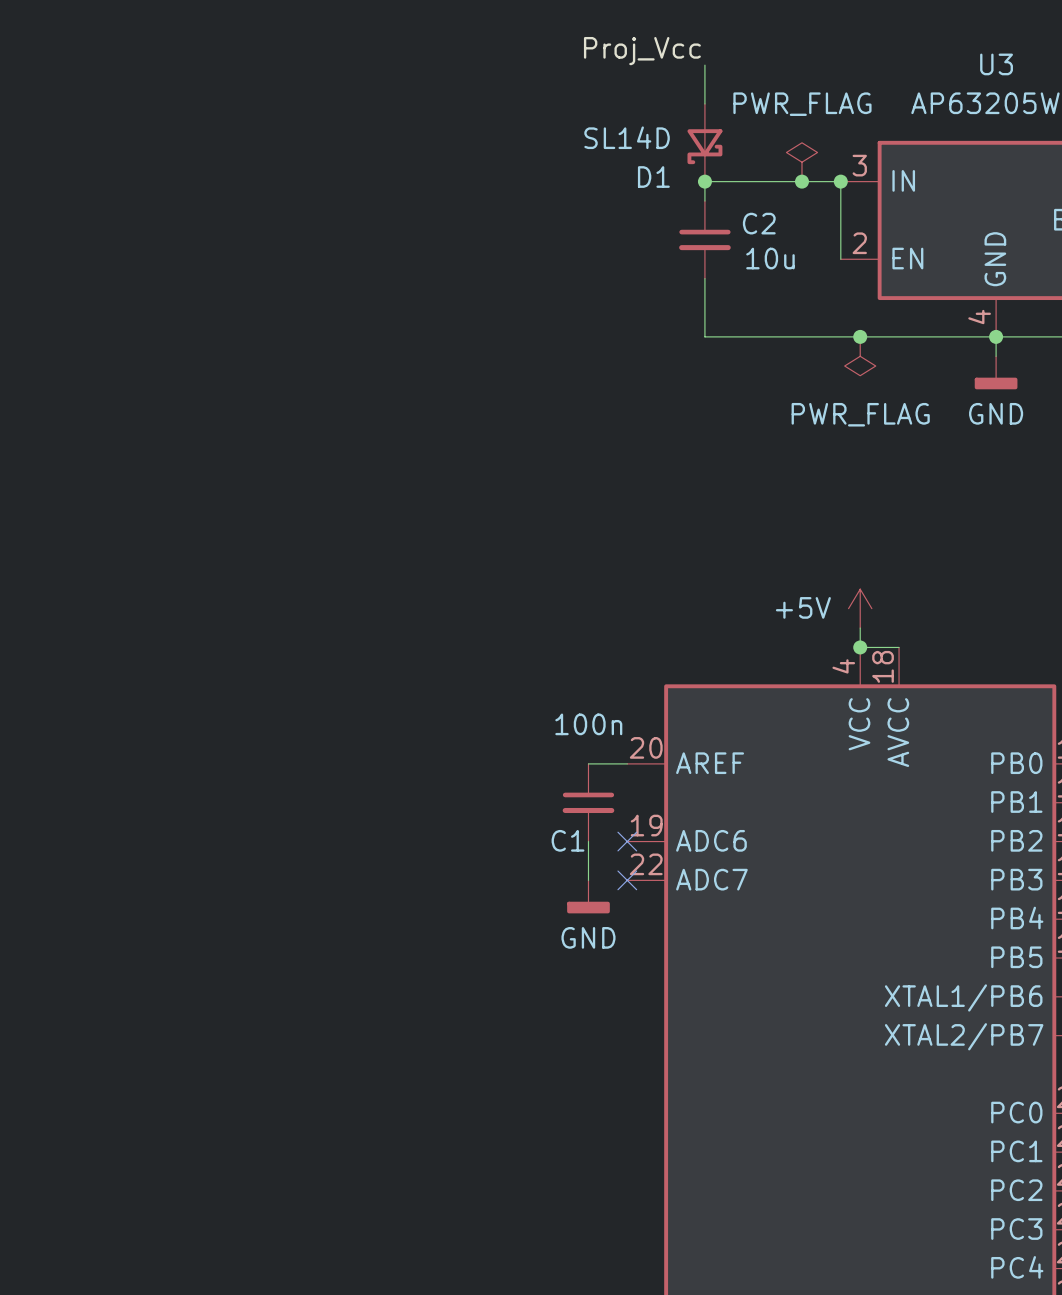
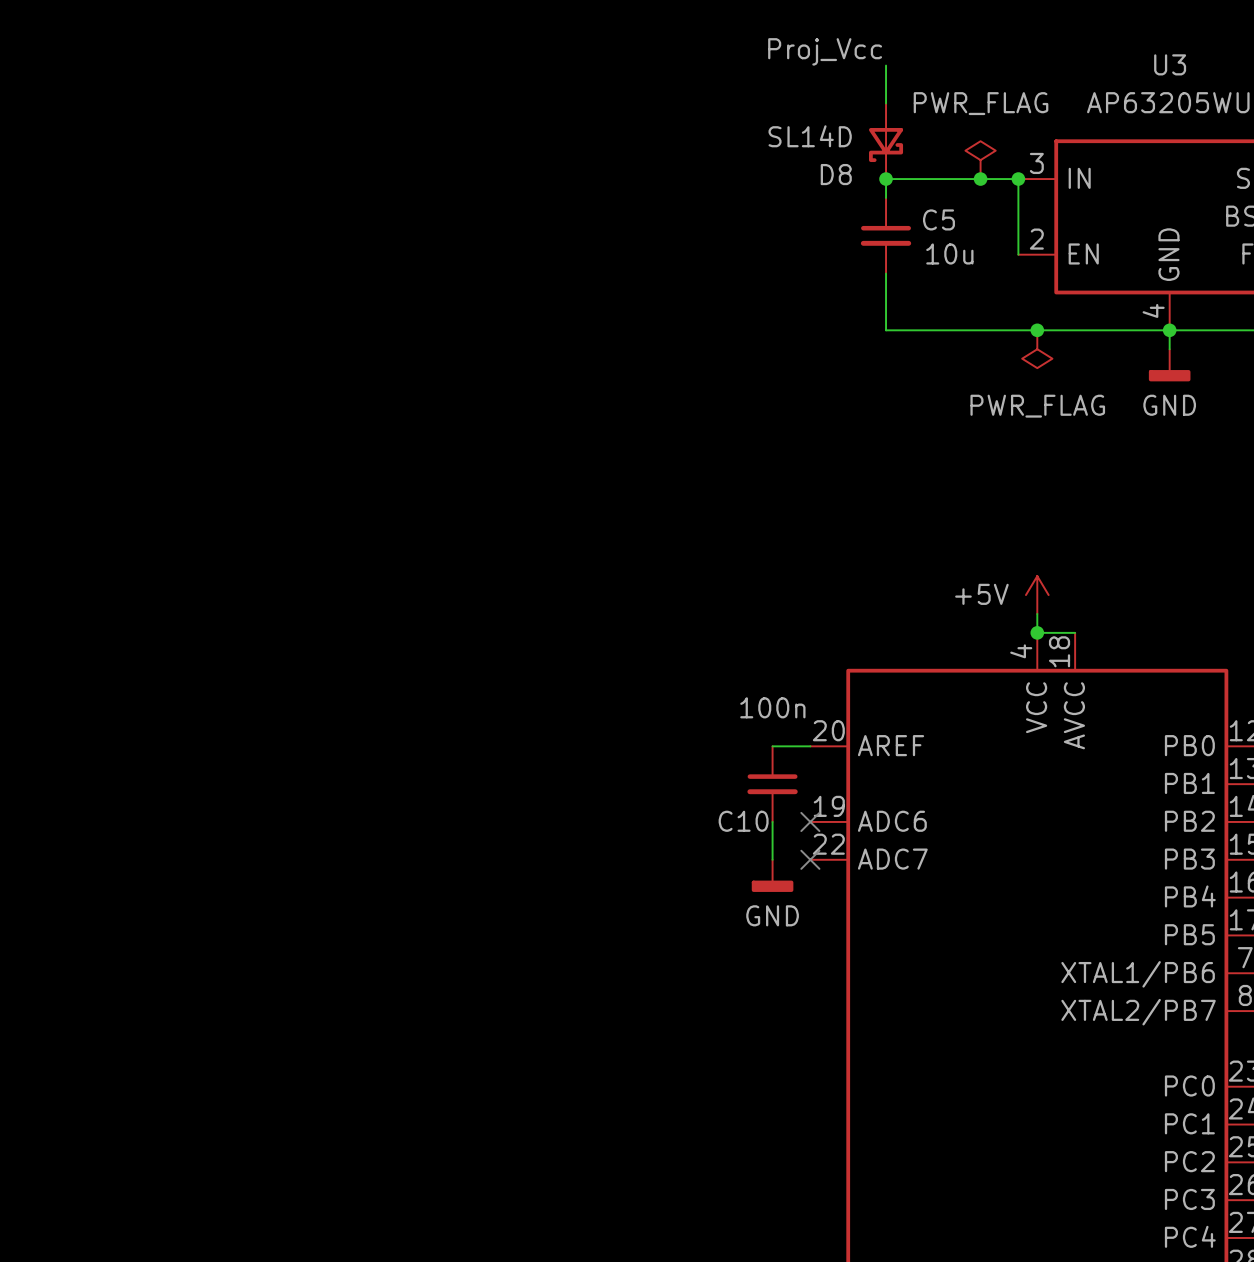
D1 name: D1 (653, 177) -> D8 (836, 174)
C2 name: C2 (759, 223) -> C5 (938, 219)
C1 name: C1 (568, 840) -> C10 (743, 821)

